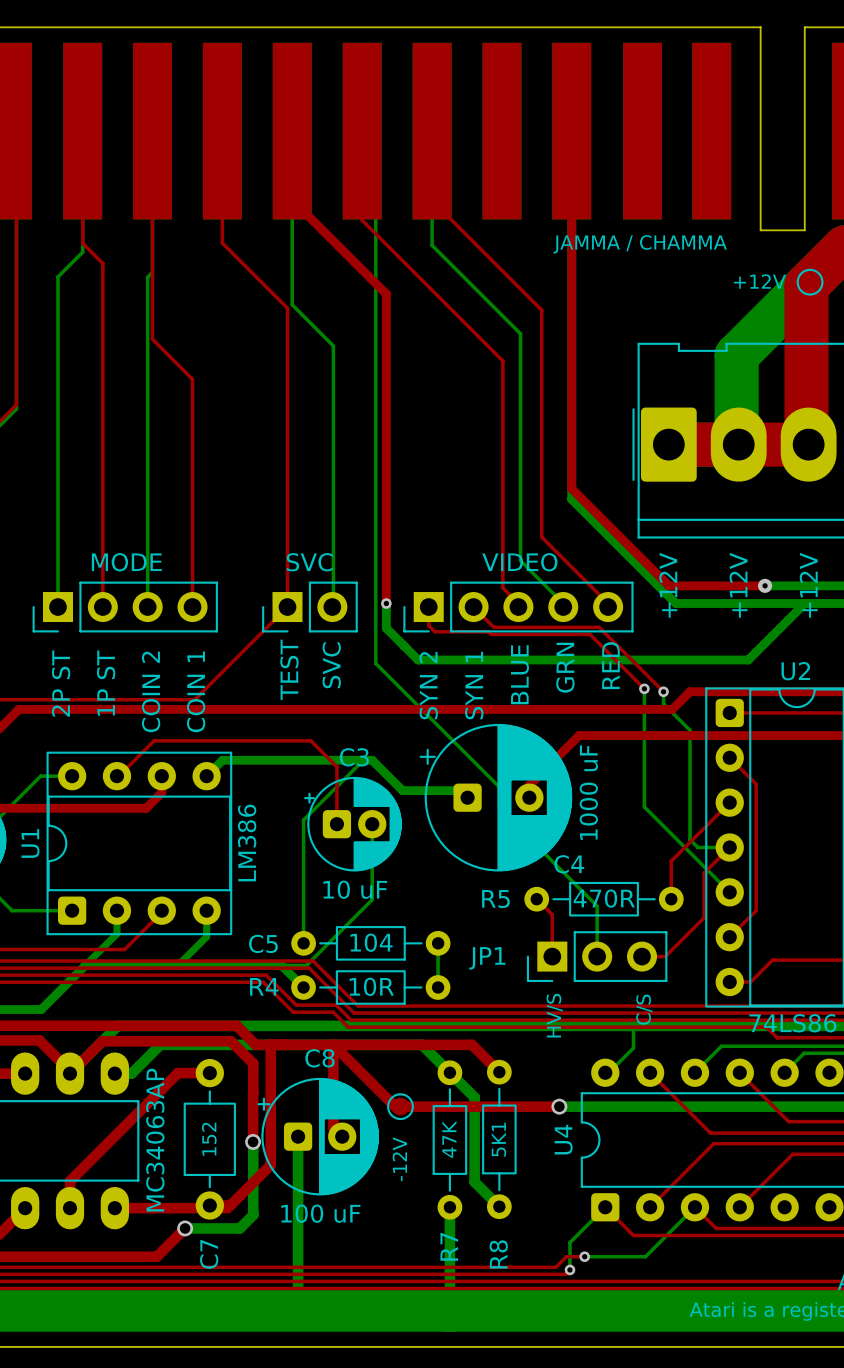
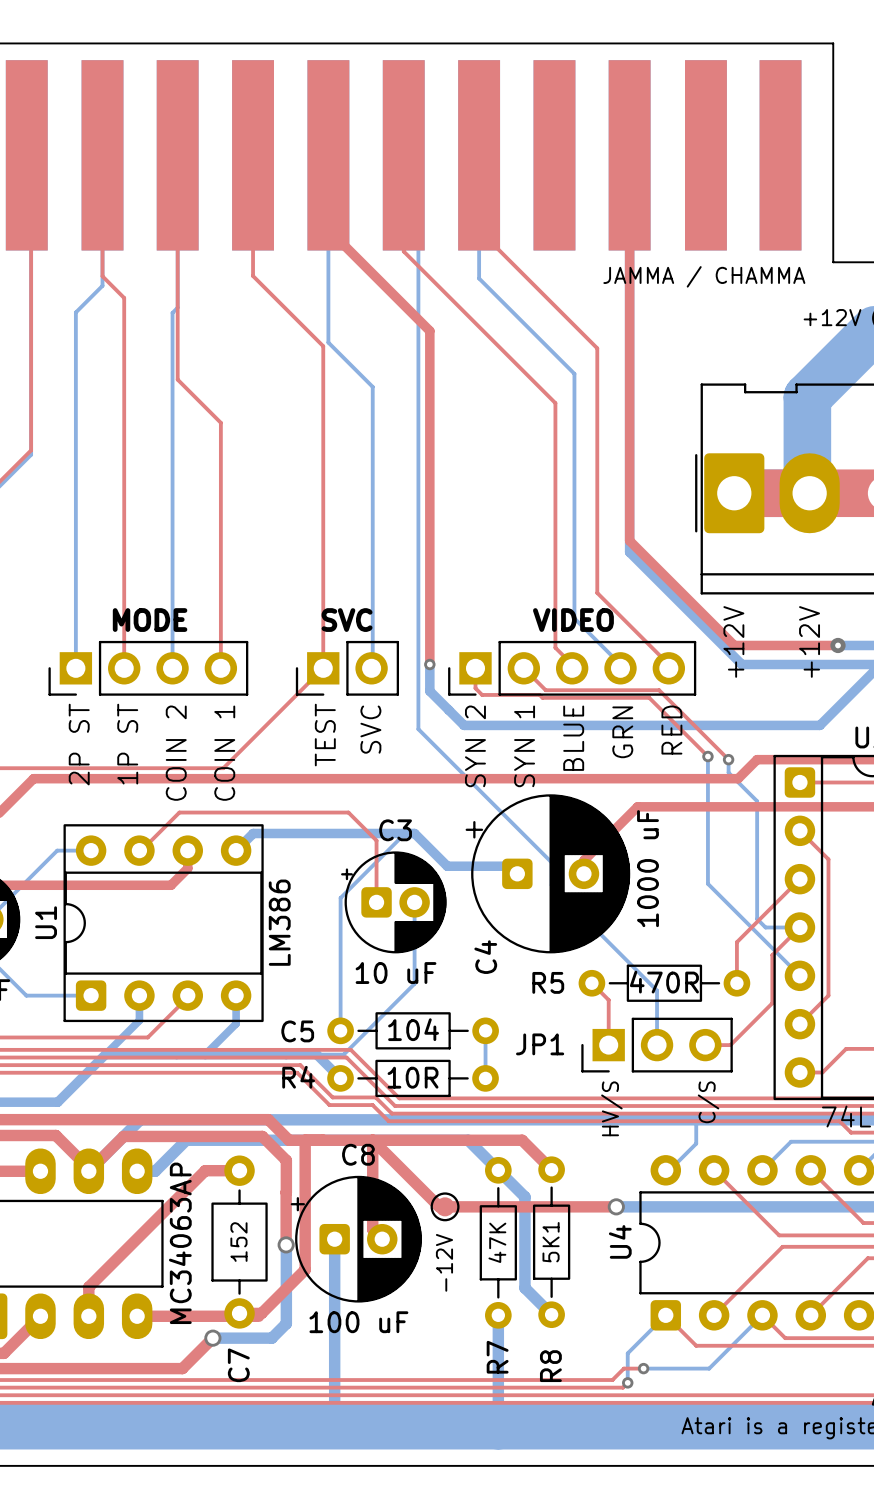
C4 name rotation: 0° (569, 864) -> 90° counterclockwise (485, 957)
C4 name position: C4 (569, 864) -> C4 (485, 957)

